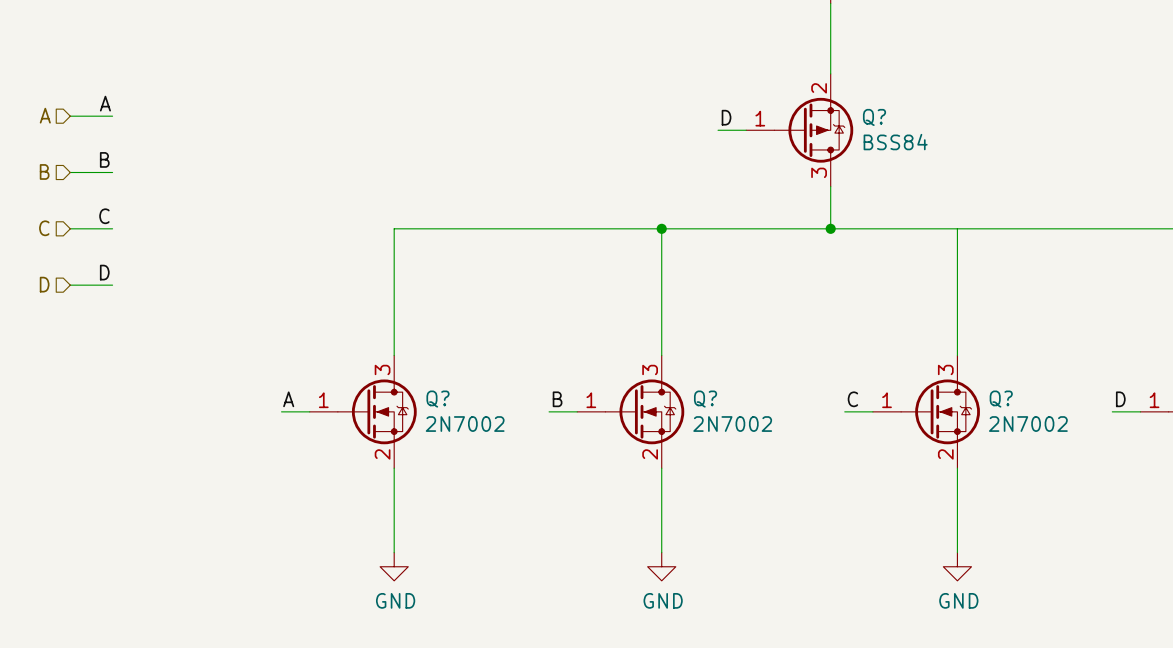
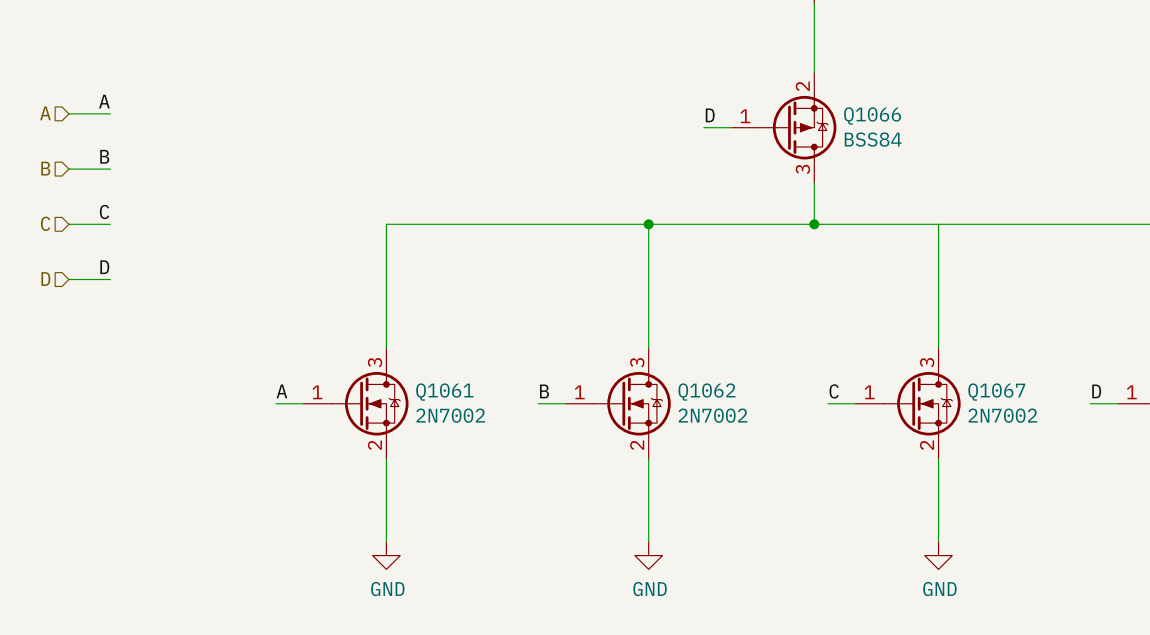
Q? name: Q? (874, 117) -> Q1066 (872, 115)
Q? name: Q? (438, 399) -> Q1061 (444, 392)
Q? name: Q? (705, 399) -> Q1062 (706, 392)
Q? name: Q? (1001, 399) -> Q1067 (996, 392)

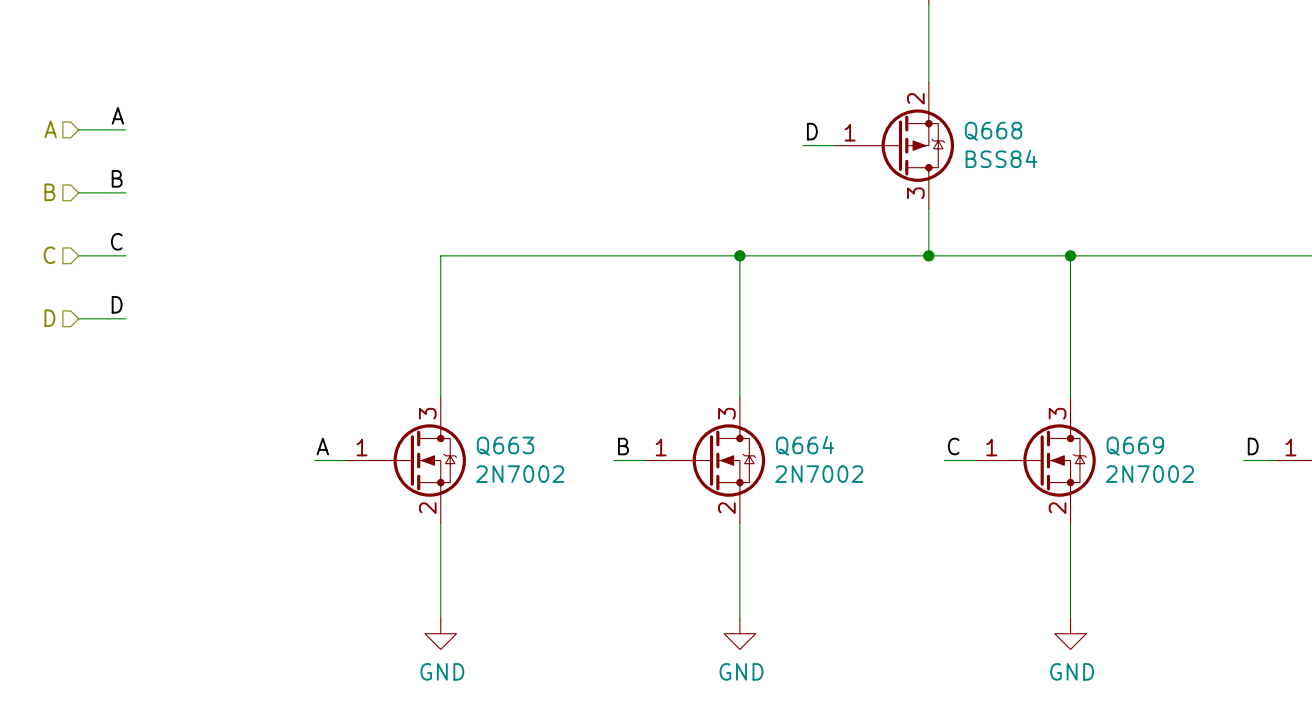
Q1066 name: Q1066 (872, 115) -> Q668 (993, 131)
junction: none -> (1070, 255)
Q1061 name: Q1061 (444, 392) -> Q663 (505, 446)
Q1062 name: Q1062 (706, 392) -> Q664 (805, 445)
Q1067 name: Q1067 (996, 392) -> Q669 (1135, 446)

